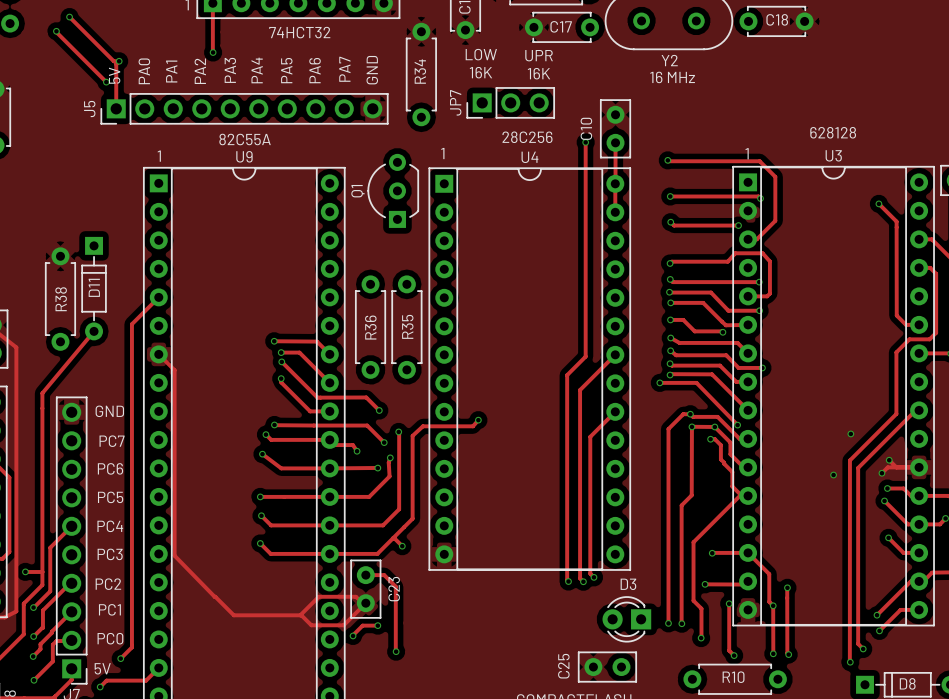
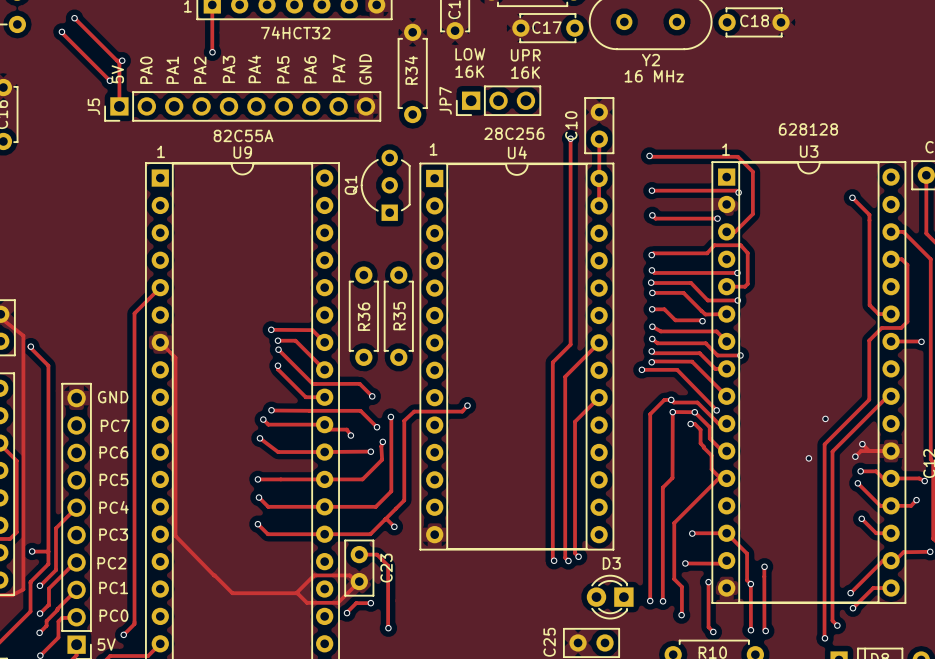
D11: (94, 288) -> none
R38: (60, 299) -> none
track: (94, 331) (42, 393) -> (30, 346) (29, 346) (48, 365) (48, 379)
via: none -> (30, 346)

